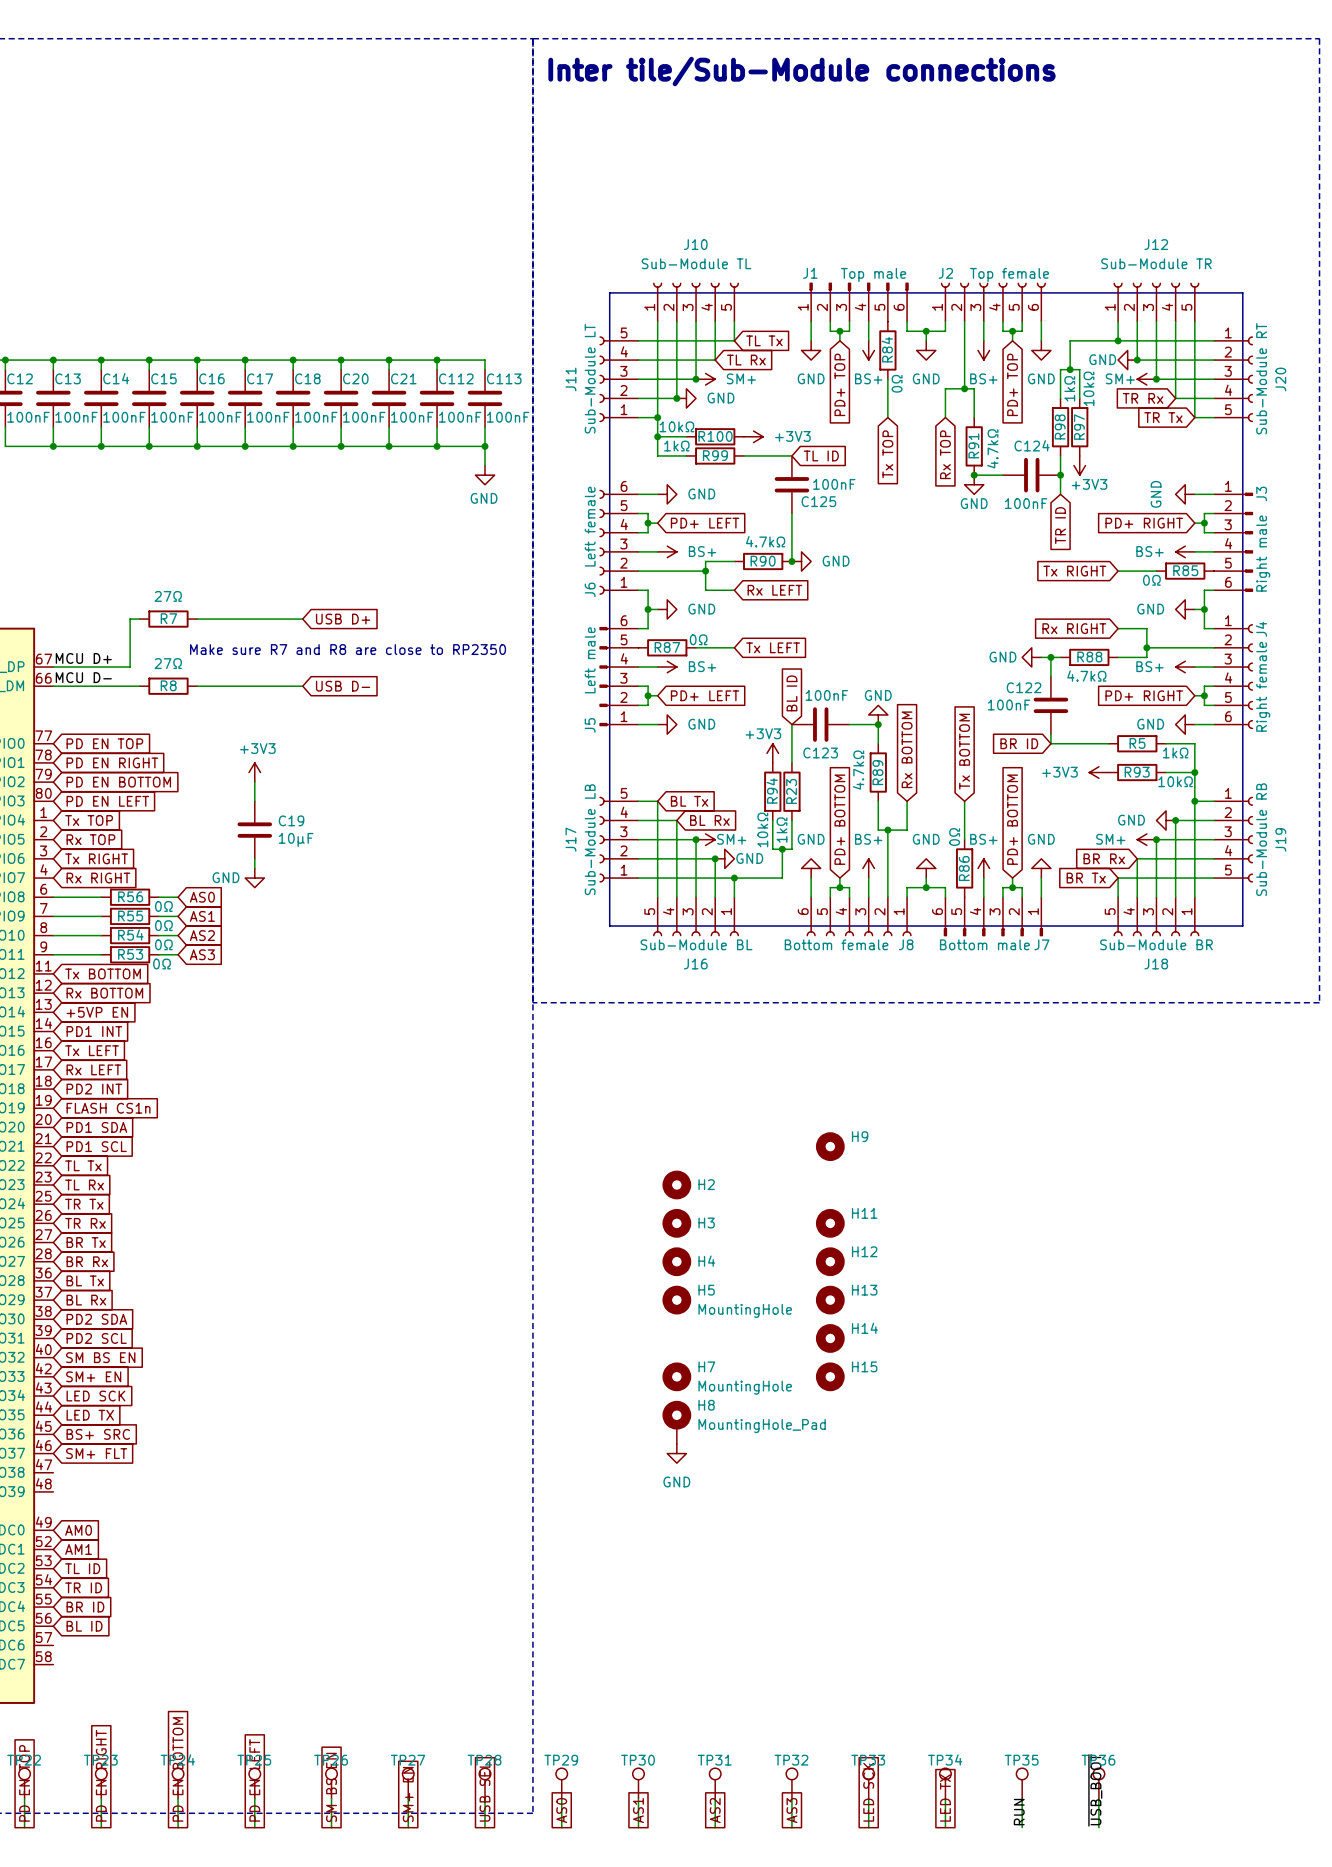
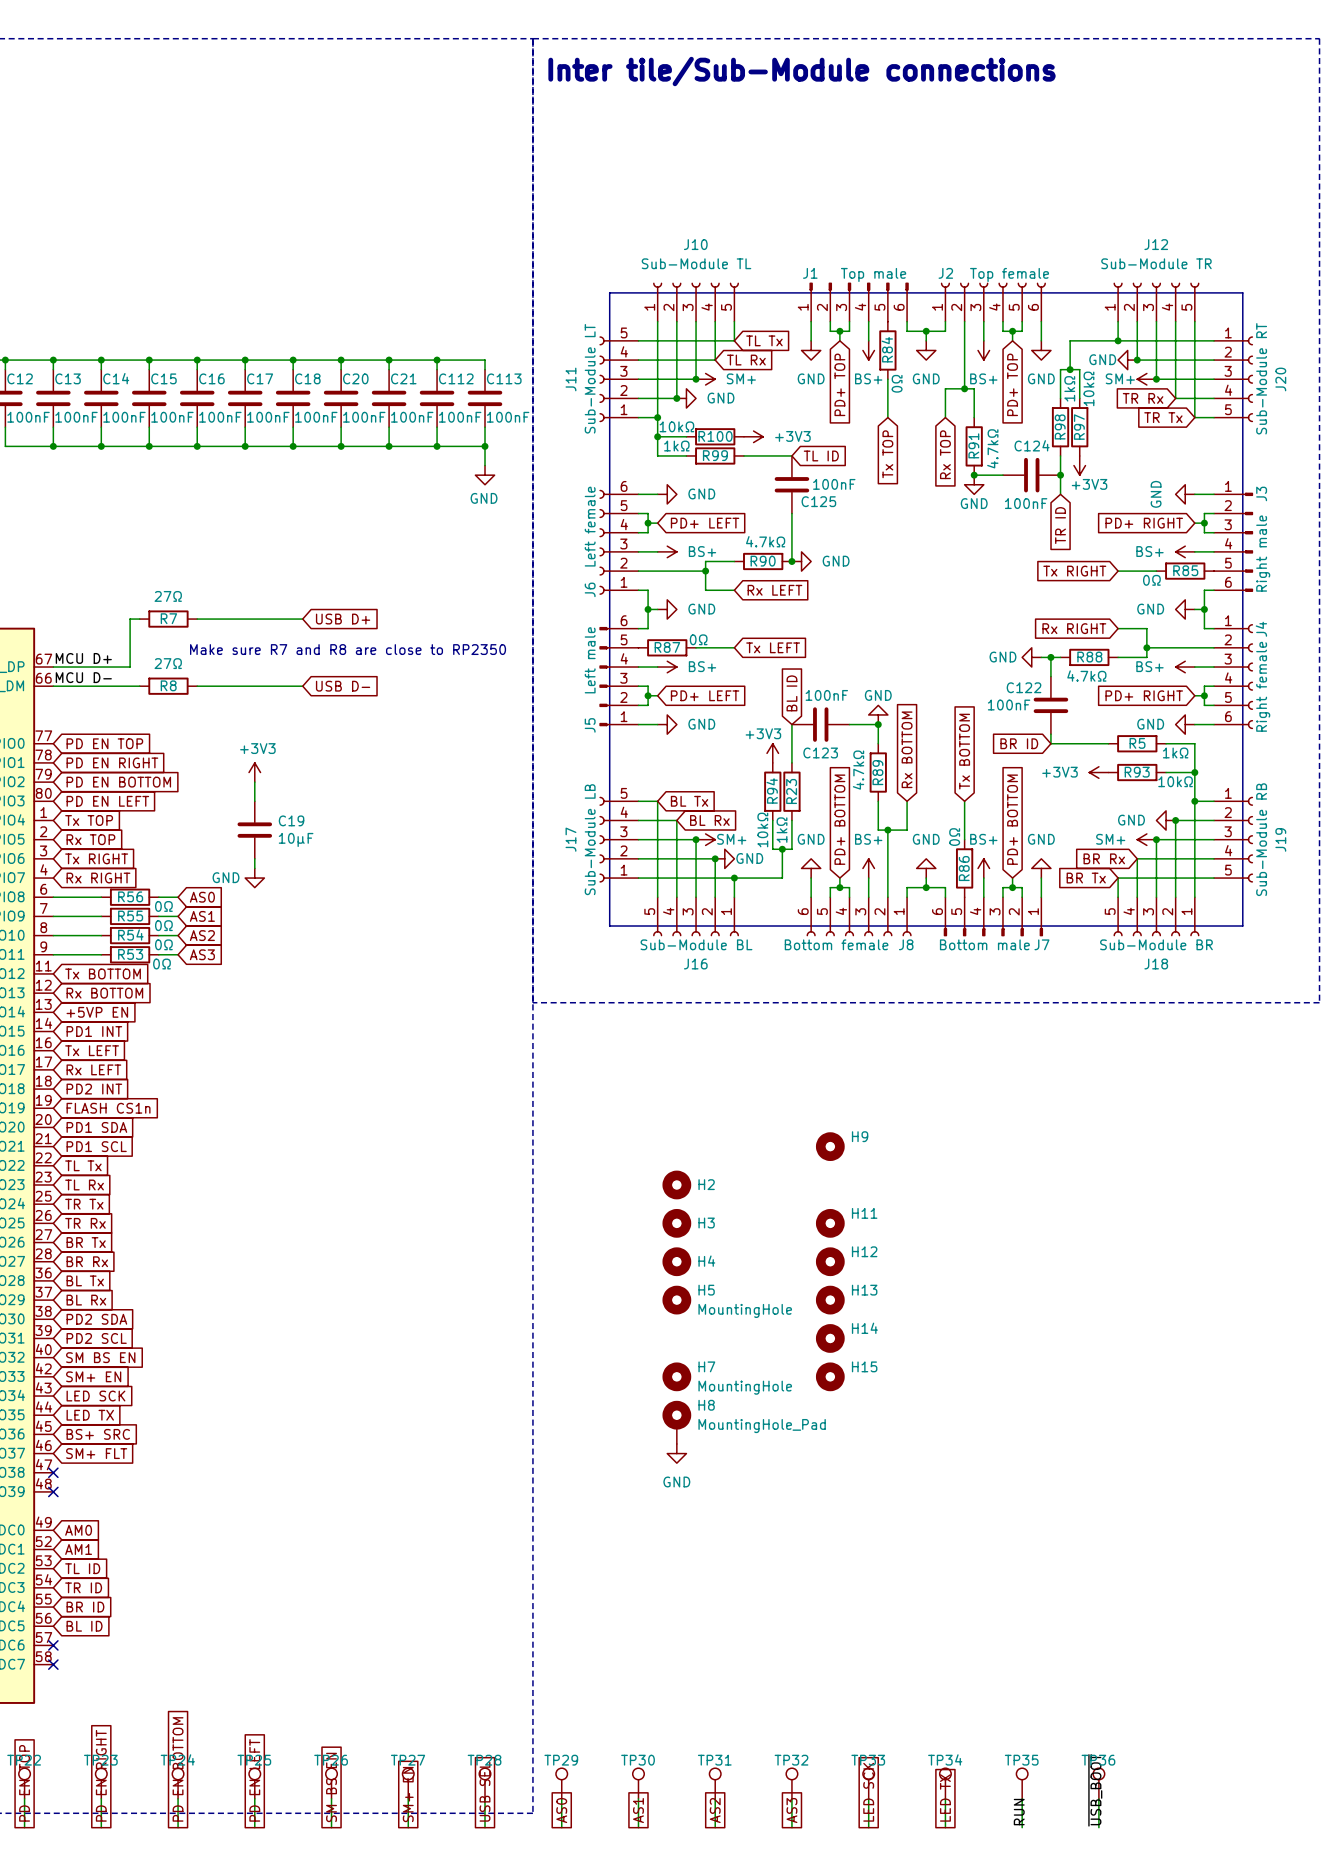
no-connect mark: none -> (53, 1472)
no-connect mark: none -> (53, 1491)
no-connect mark: none -> (53, 1645)
no-connect mark: none -> (53, 1664)

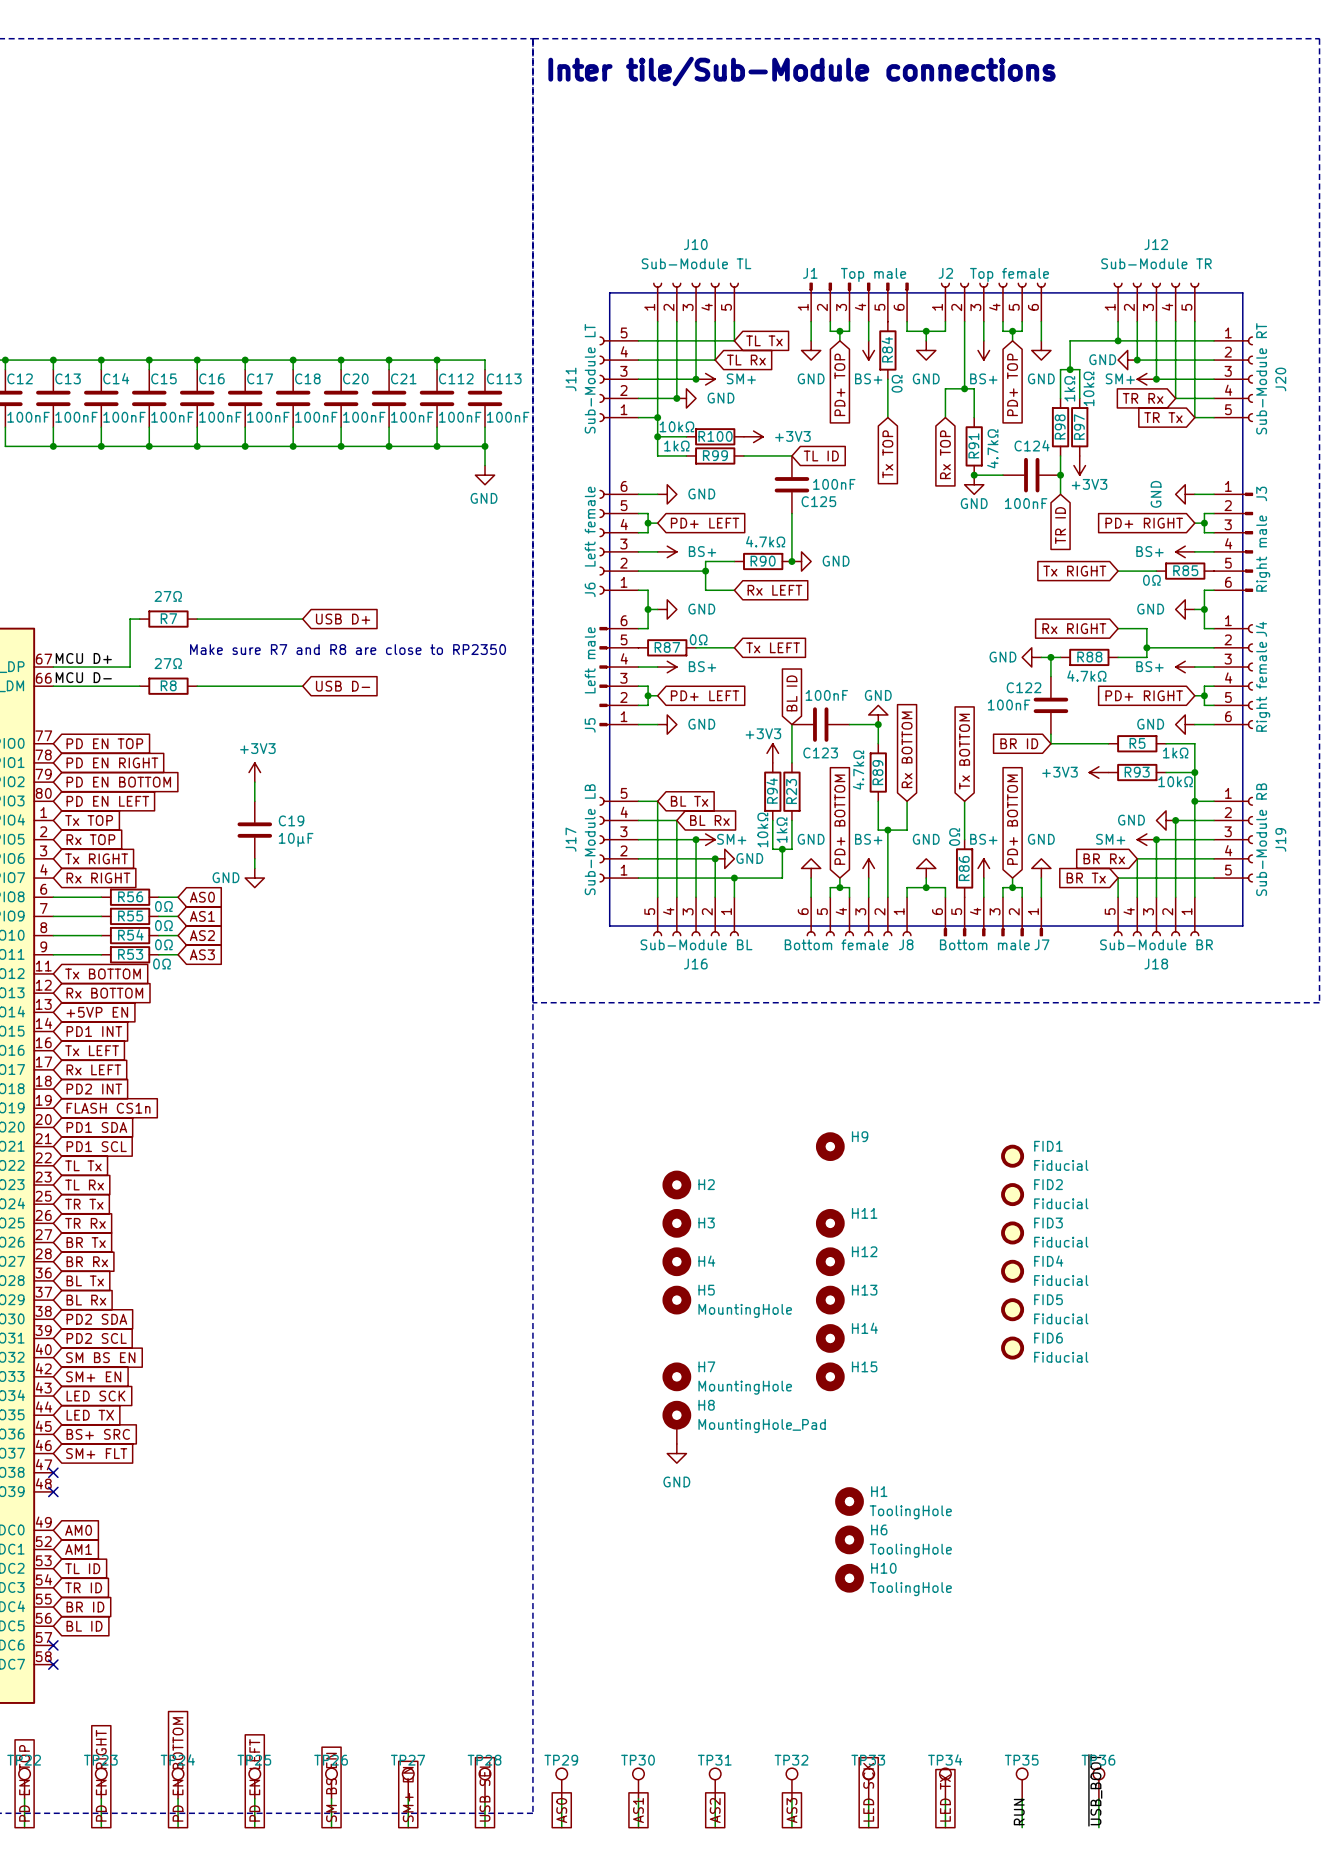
FID1: none -> Fiducial (1012, 1156)
FID2: none -> Fiducial (1012, 1194)
FID3: none -> Fiducial (1012, 1232)
FID4: none -> Fiducial (1012, 1271)
FID5: none -> Fiducial (1012, 1309)
FID6: none -> Fiducial (1012, 1348)
H1: none -> ToolingHole (849, 1501)
H6: none -> ToolingHole (849, 1539)
H10: none -> ToolingHole (849, 1578)

